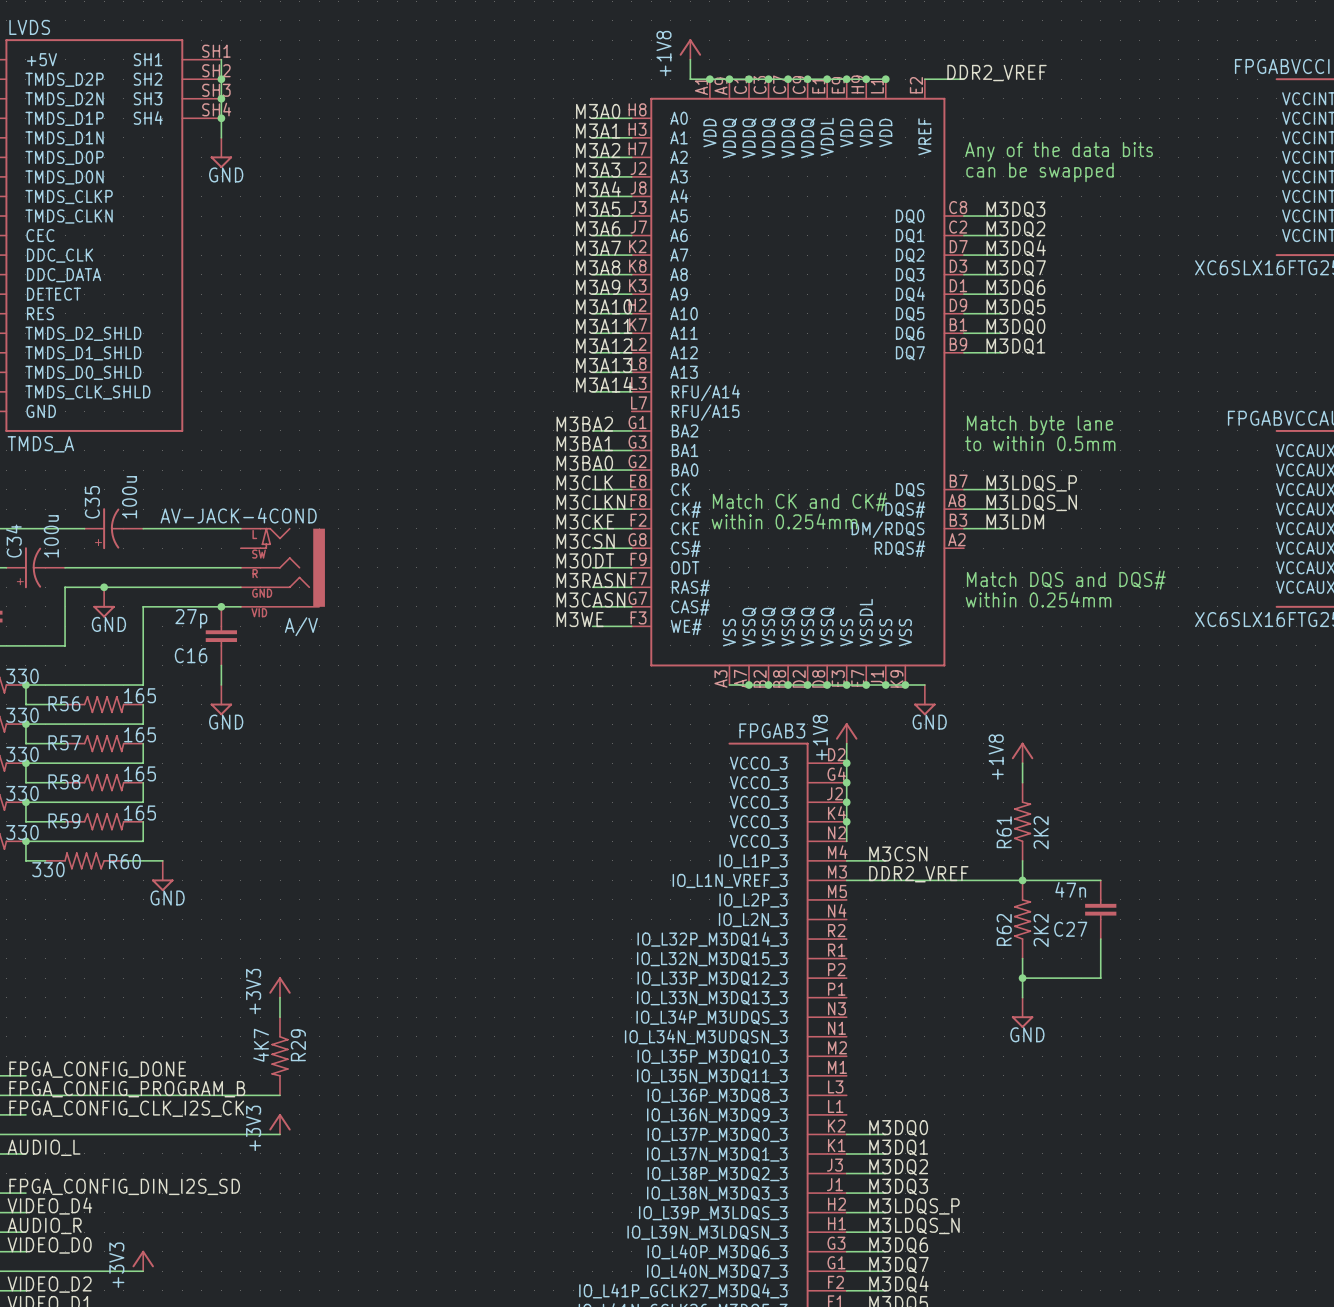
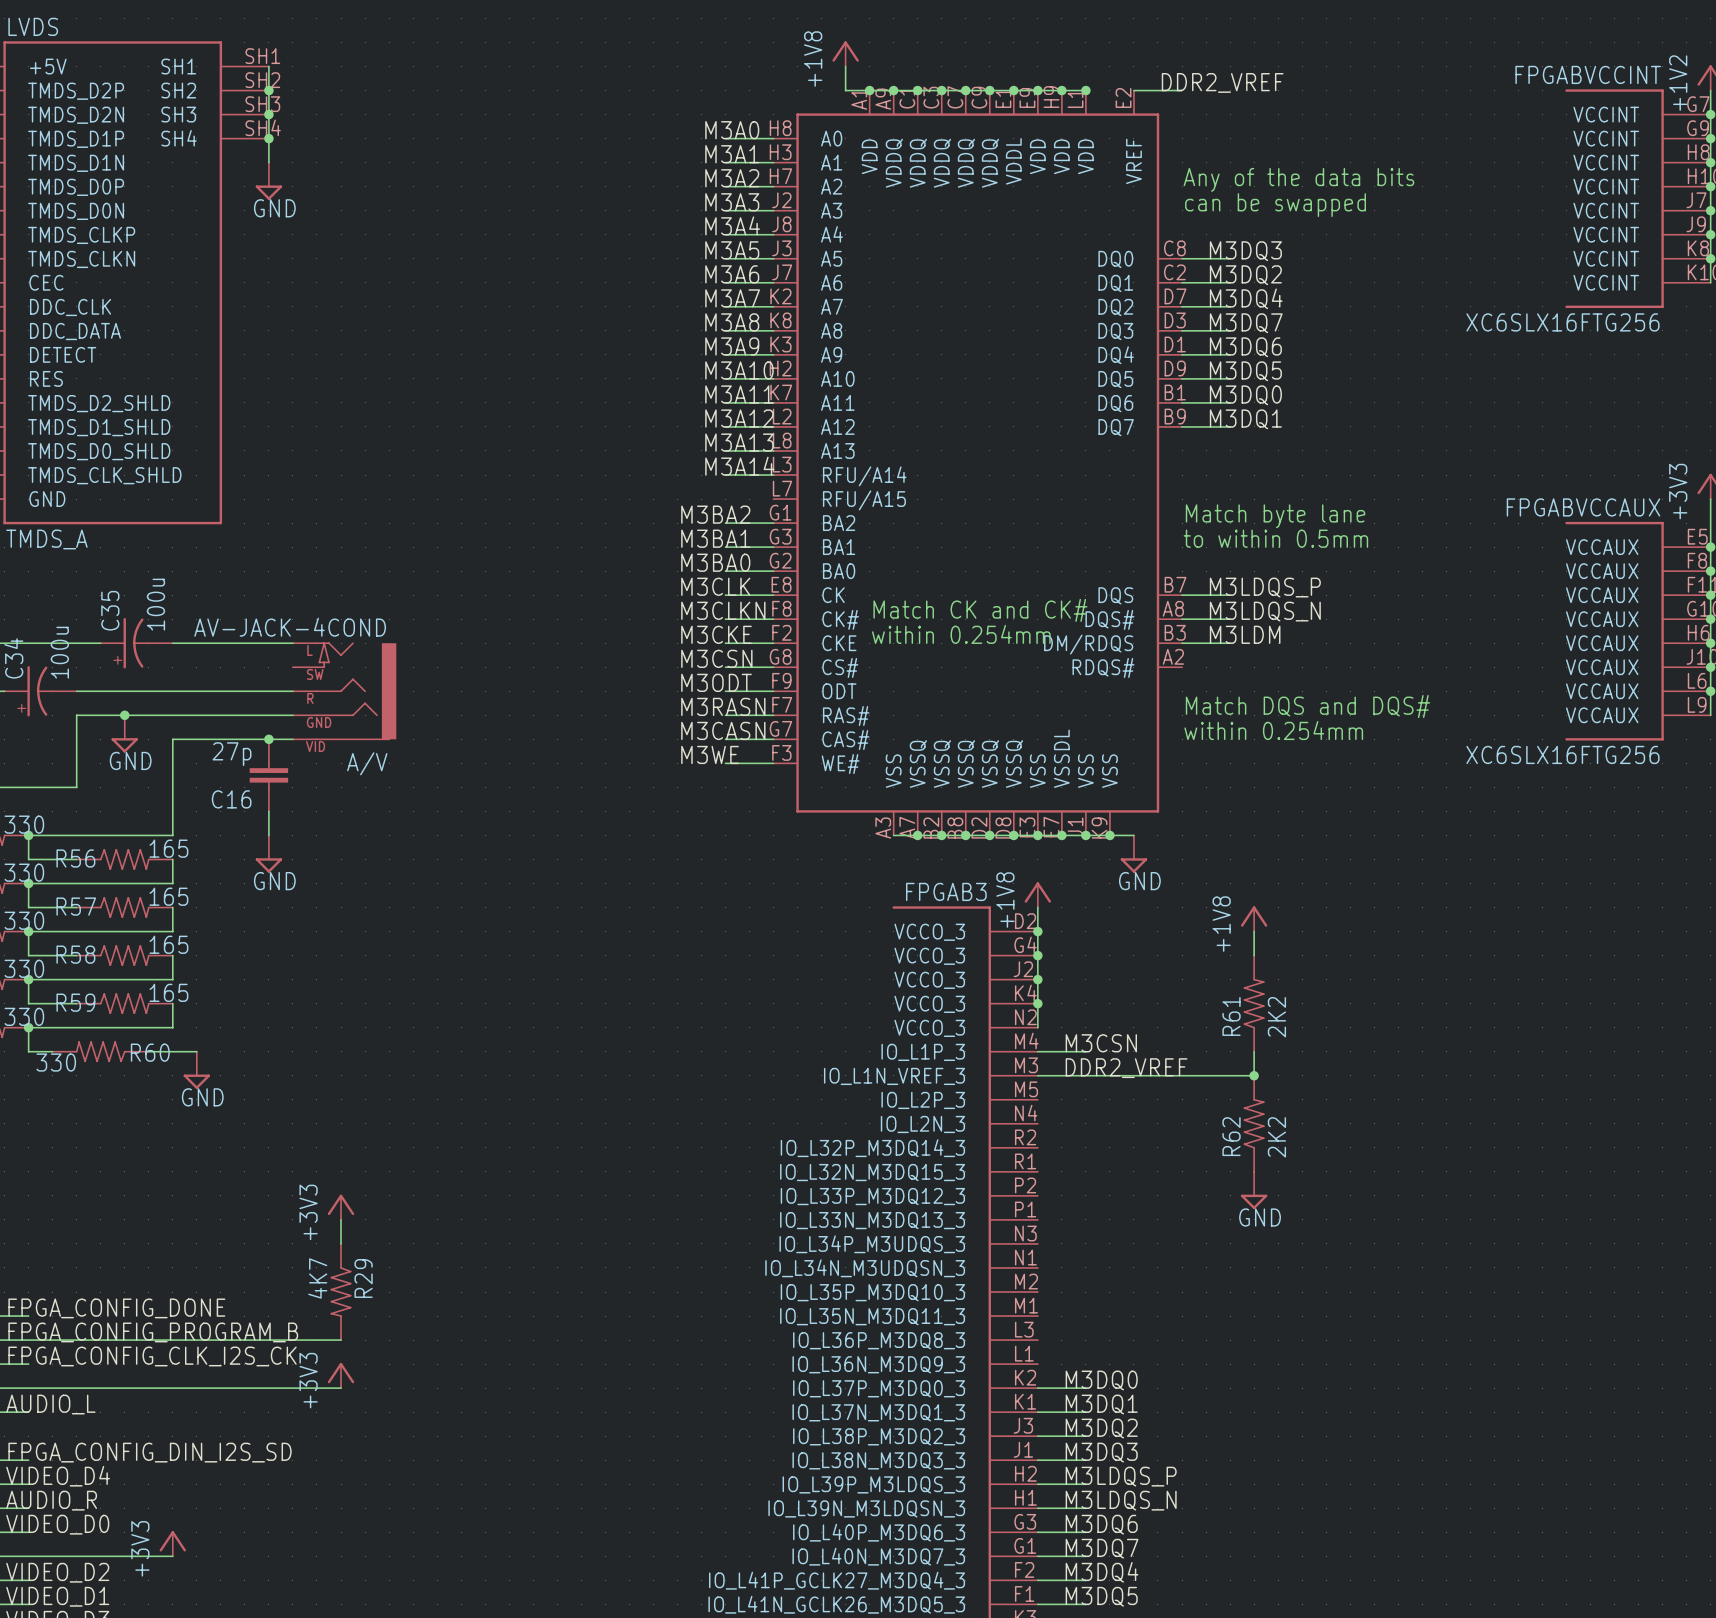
wire: (1022, 880) (1100, 880) -> none
C27: 47n (1100, 909) -> none
wire: (1100, 939) (1100, 978) (1022, 978) -> none
junction: (1022, 978) -> none
power symbol position: GND (1022, 1012) -> GND (1254, 1190)

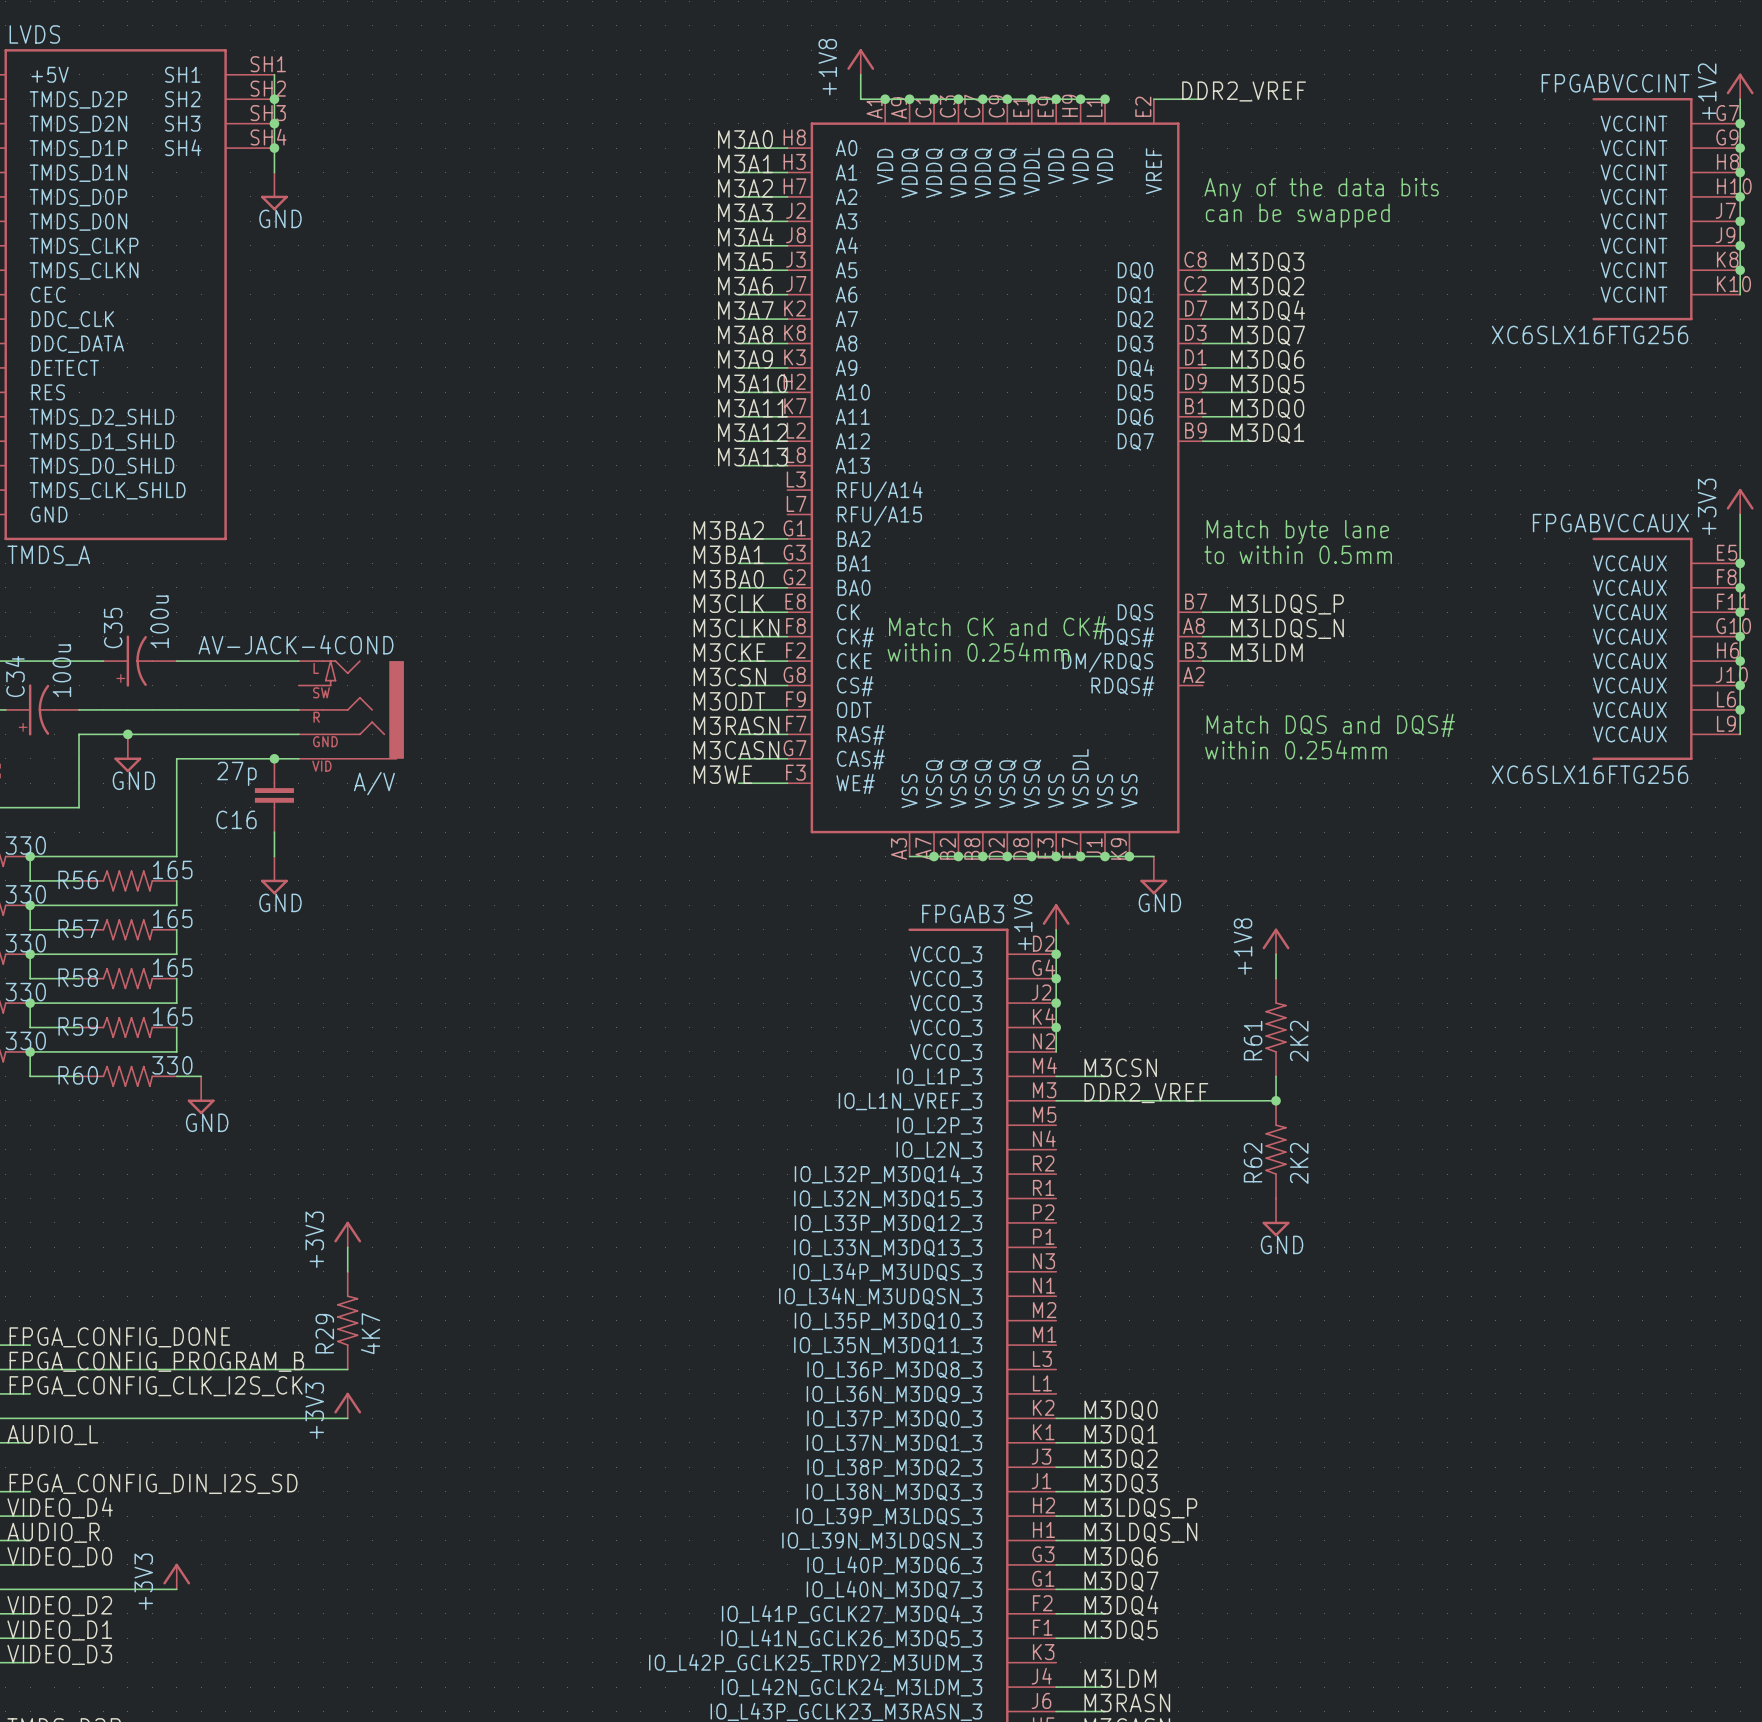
label: M3A14 (739, 466) -> none
wire: (725, 475) (773, 475) -> none
R60 rotation: 0° (100, 1051) -> 180° (127, 1076)
R29 rotation: 0° (341, 1292) -> 180° (347, 1320)

